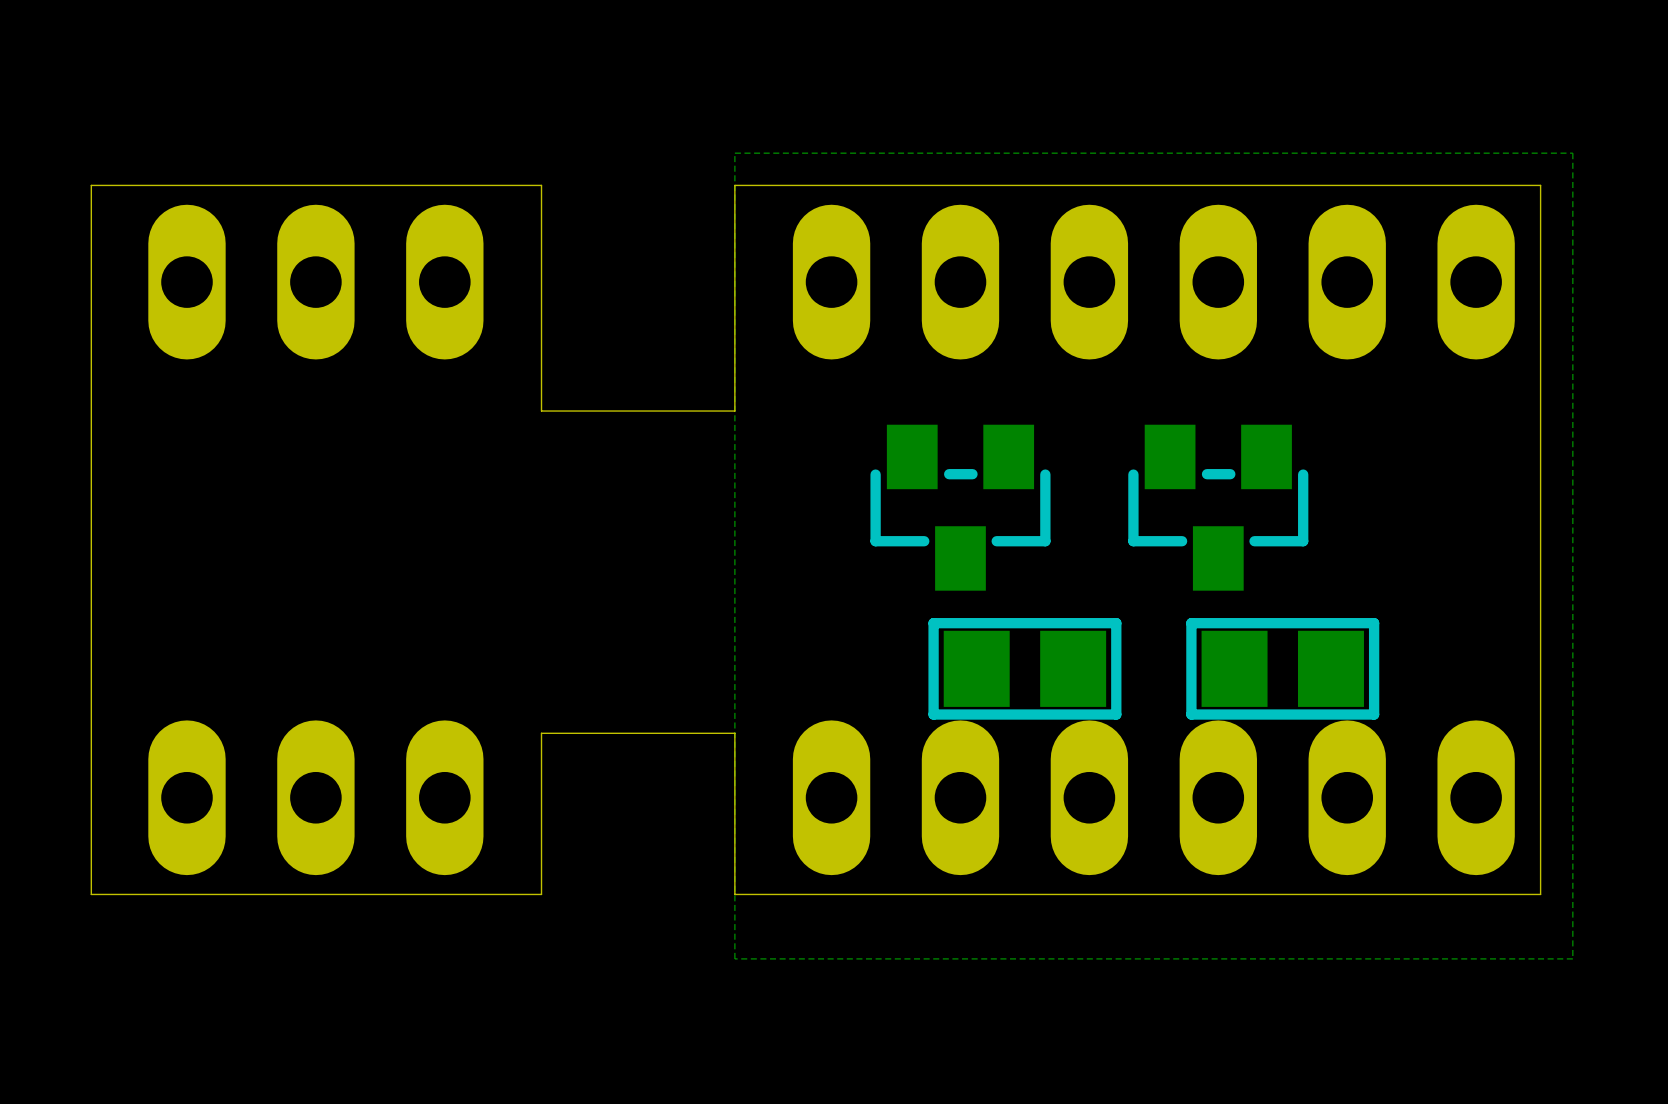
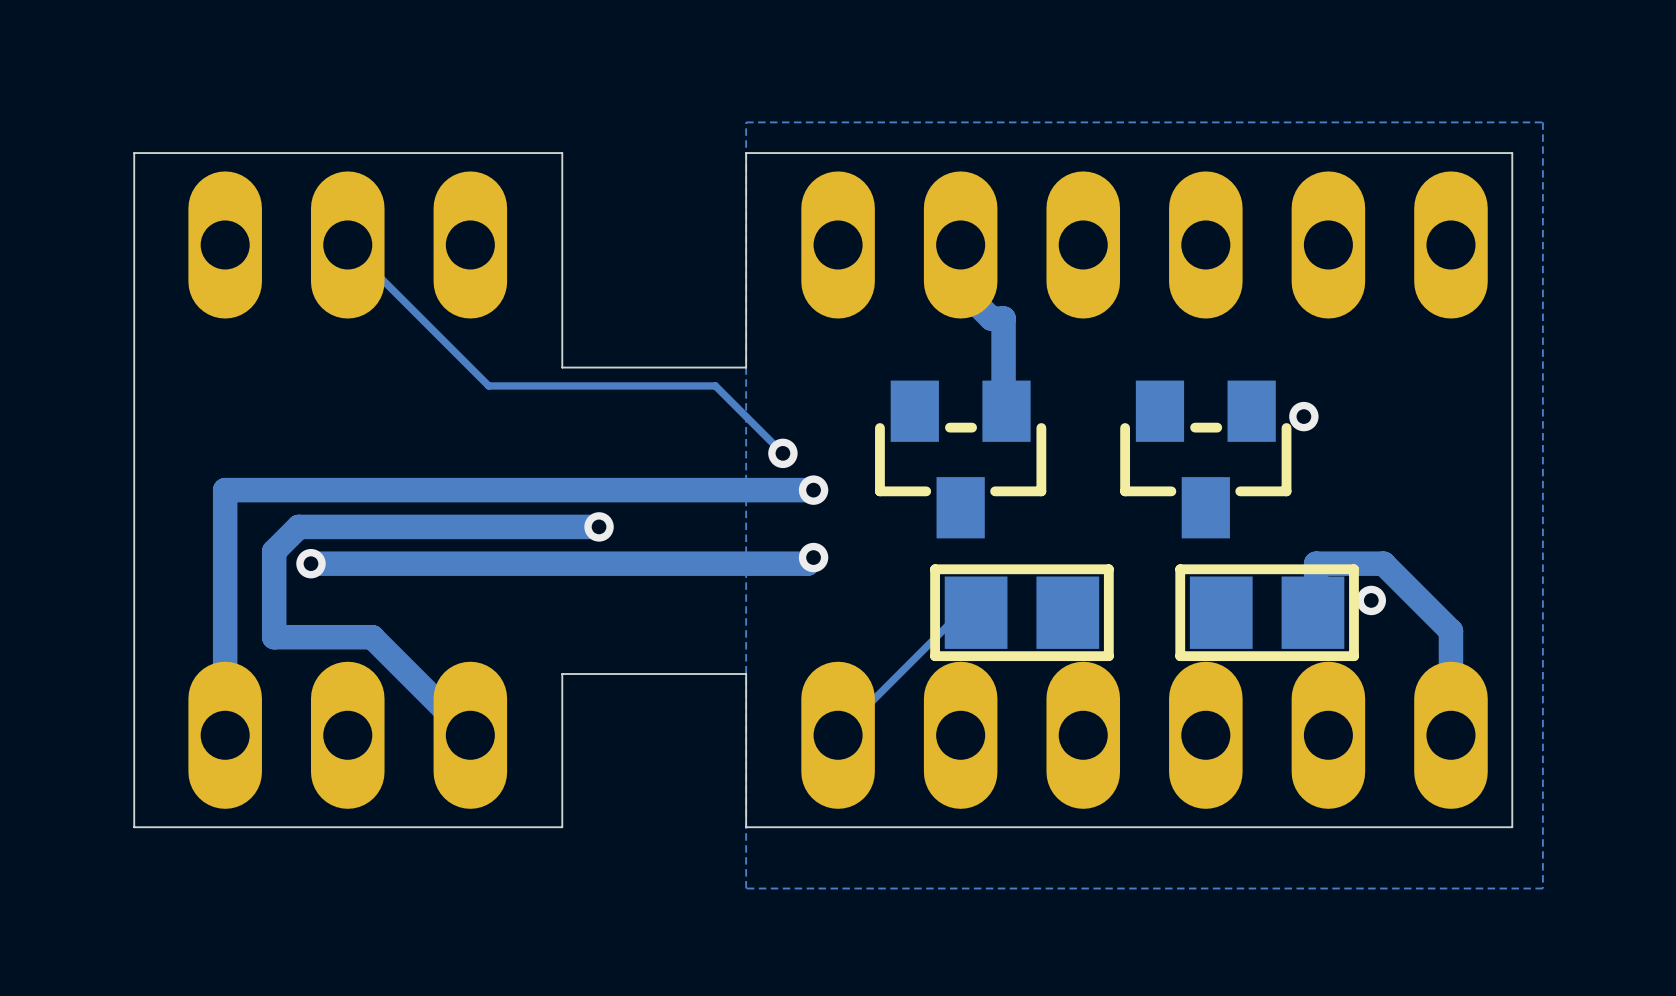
track: none -> (347, 244) (488, 385) (715, 385) (782, 453)
track: none -> (960, 244) (960, 287) (991, 318) (1003, 318) (1003, 410) (1006, 411)
via: none -> (1303, 416)
via: none -> (782, 453)
track: none -> (813, 490) (225, 490) (225, 735)
via: none -> (813, 490)
track: none -> (599, 526) (298, 526) (274, 551) (274, 637) (372, 637) (470, 735)
via: none -> (599, 526)
track: none -> (813, 557) (807, 563) (310, 563)
via: none -> (813, 557)
via: none -> (310, 563)
via: none -> (1371, 600)
track: none -> (976, 612) (960, 612) (838, 735)
track: none -> (1312, 612) (1316, 612) (1316, 563) (1383, 563) (1450, 631) (1450, 735)

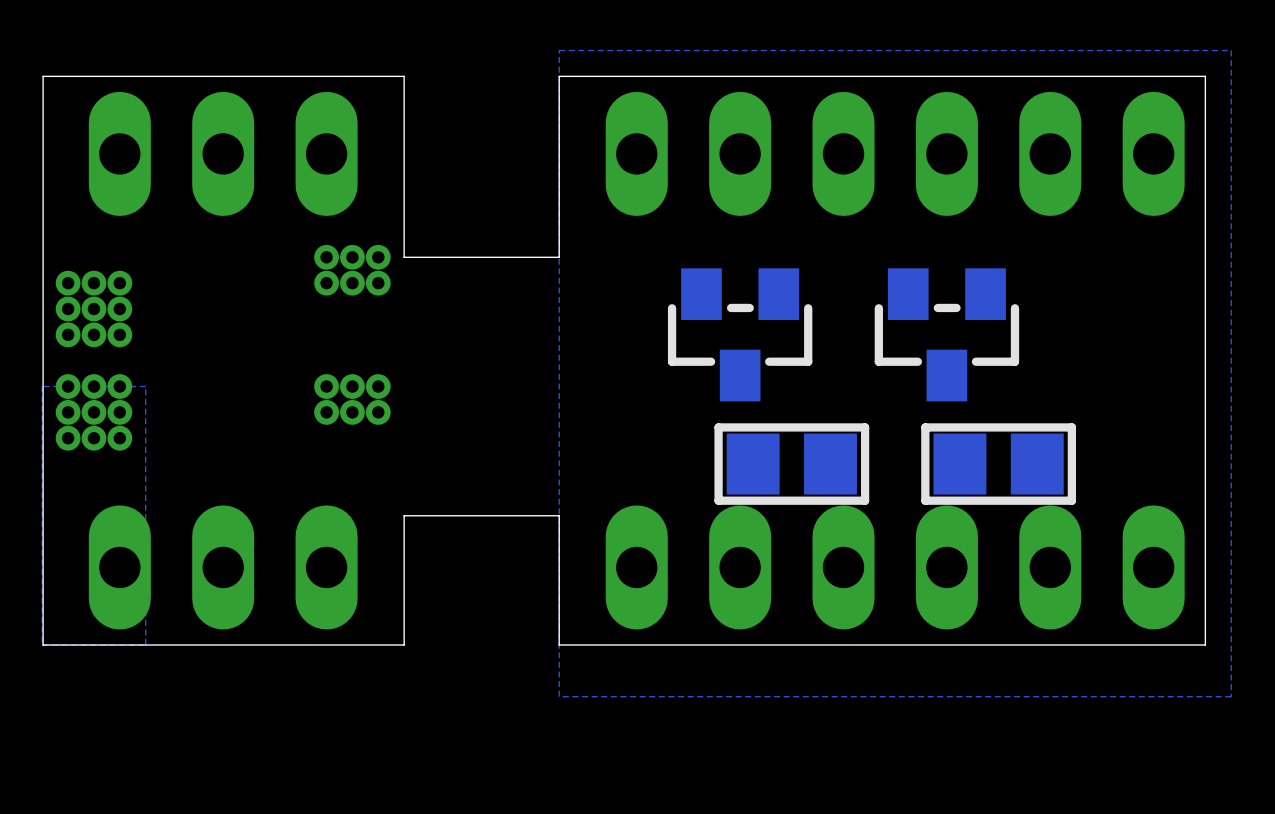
track: (347, 244) (488, 385) (715, 385) (782, 453) -> none
track: (960, 244) (960, 287) (991, 318) (1003, 318) (1003, 410) (1006, 411) -> none
via: none -> (326, 257)
via: none -> (352, 257)
via: none -> (378, 257)
via: none -> (68, 283)
via: none -> (93, 283)
via: none -> (119, 283)
via: none -> (326, 283)
via: none -> (352, 283)
via: none -> (378, 283)
via: (1303, 416) -> none
via: none -> (68, 308)
via: none -> (93, 308)
via: none -> (119, 308)
via: (782, 453) -> none
via: none -> (68, 334)
via: none -> (93, 334)
via: none -> (119, 334)
track: (813, 490) (225, 490) (225, 735) -> none
via: (813, 490) -> none
via: none -> (68, 386)
via: none -> (93, 386)
via: none -> (119, 386)
zone outline: none -> (145, 386) (145, 645) (42, 645) (42, 386) (145, 386)
via: none -> (326, 386)
via: none -> (352, 386)
via: none -> (378, 386)
track: (599, 526) (298, 526) (274, 551) (274, 637) (372, 637) (470, 735) -> none
via: (599, 526) -> none
via: none -> (68, 412)
via: none -> (93, 412)
via: none -> (119, 412)
via: none -> (326, 412)
via: none -> (352, 412)
via: none -> (378, 412)
track: (813, 557) (807, 563) (310, 563) -> none
via: (813, 557) -> none
via: (310, 563) -> none
via: none -> (68, 438)
via: none -> (93, 438)
via: none -> (119, 438)
via: (1371, 600) -> none
track: (976, 612) (960, 612) (838, 735) -> none
track: (1312, 612) (1316, 612) (1316, 563) (1383, 563) (1450, 631) (1450, 735) -> none

